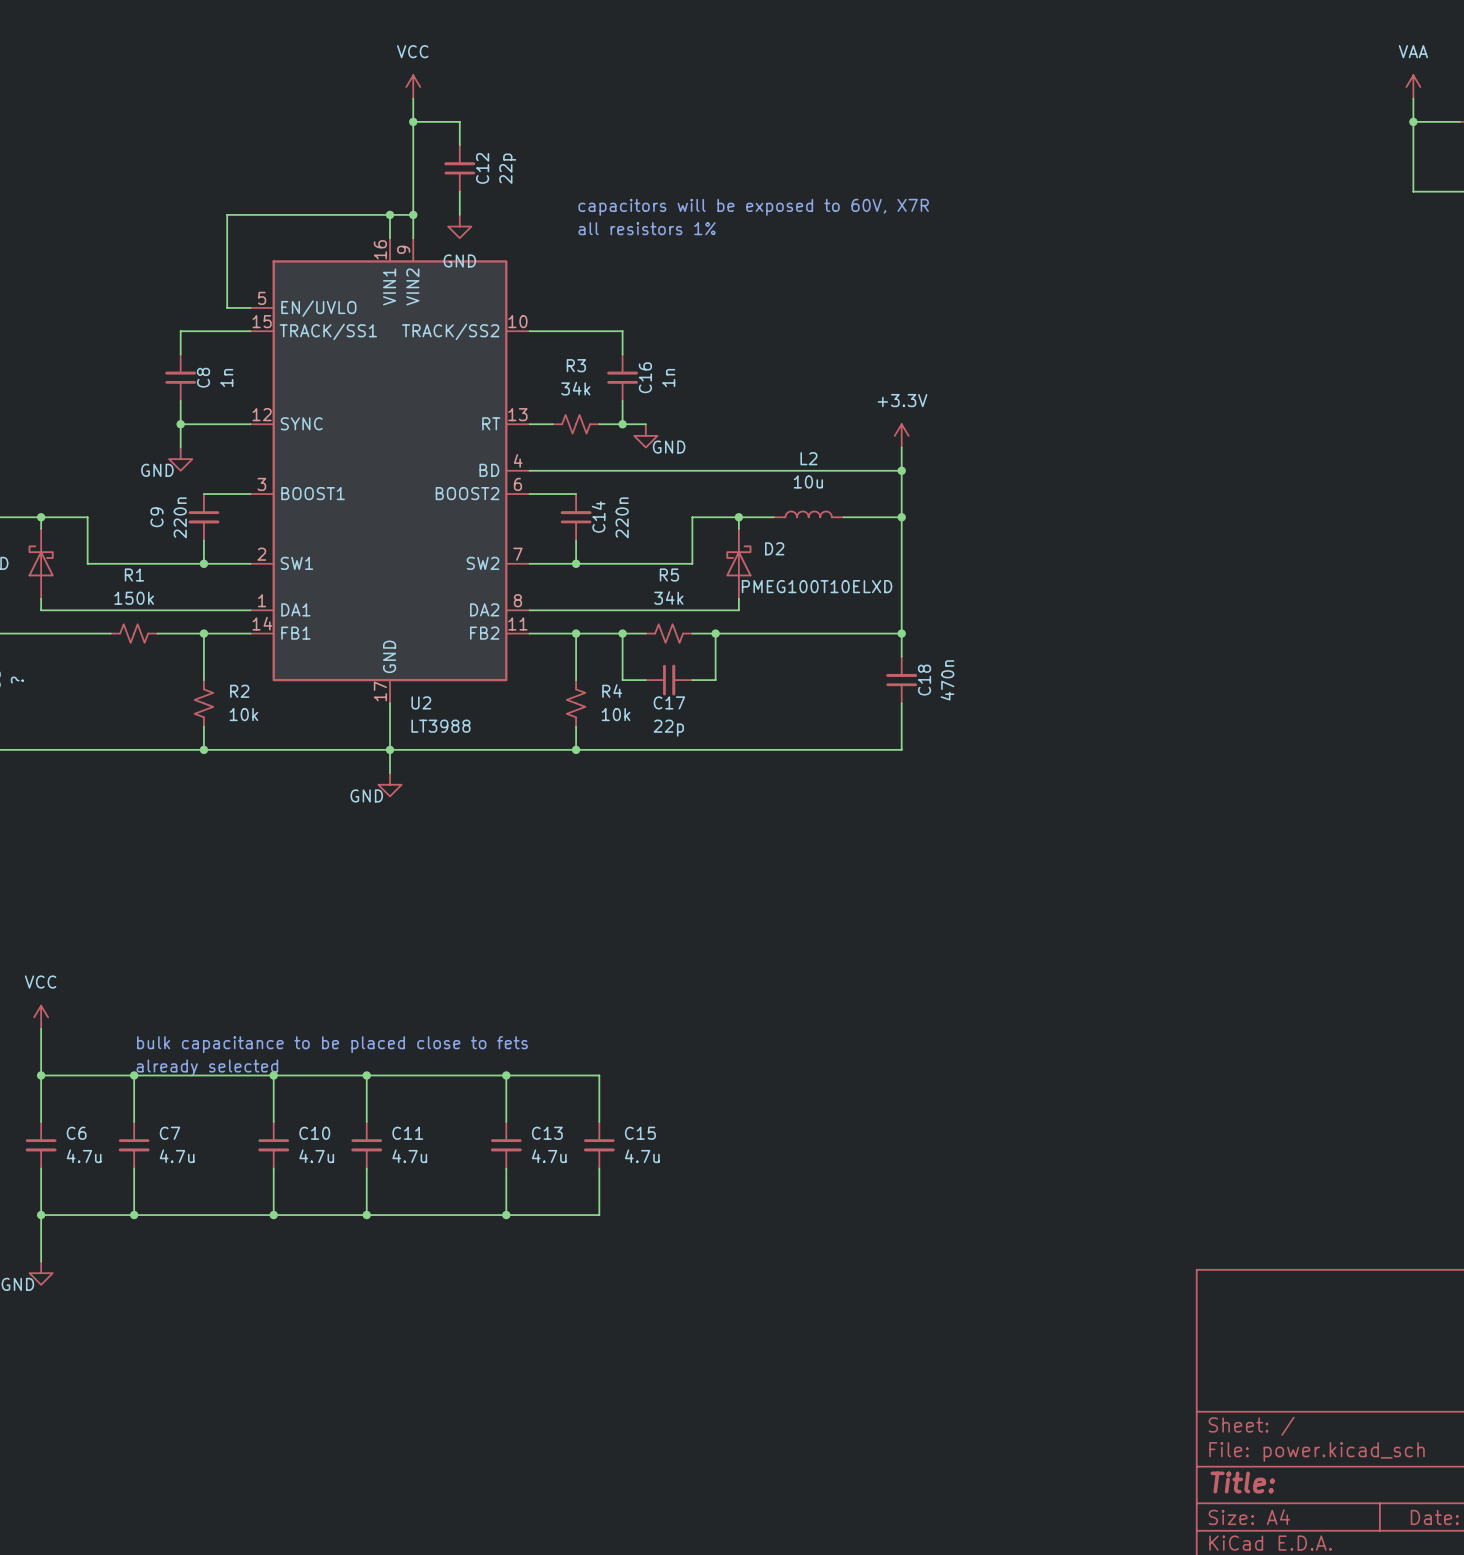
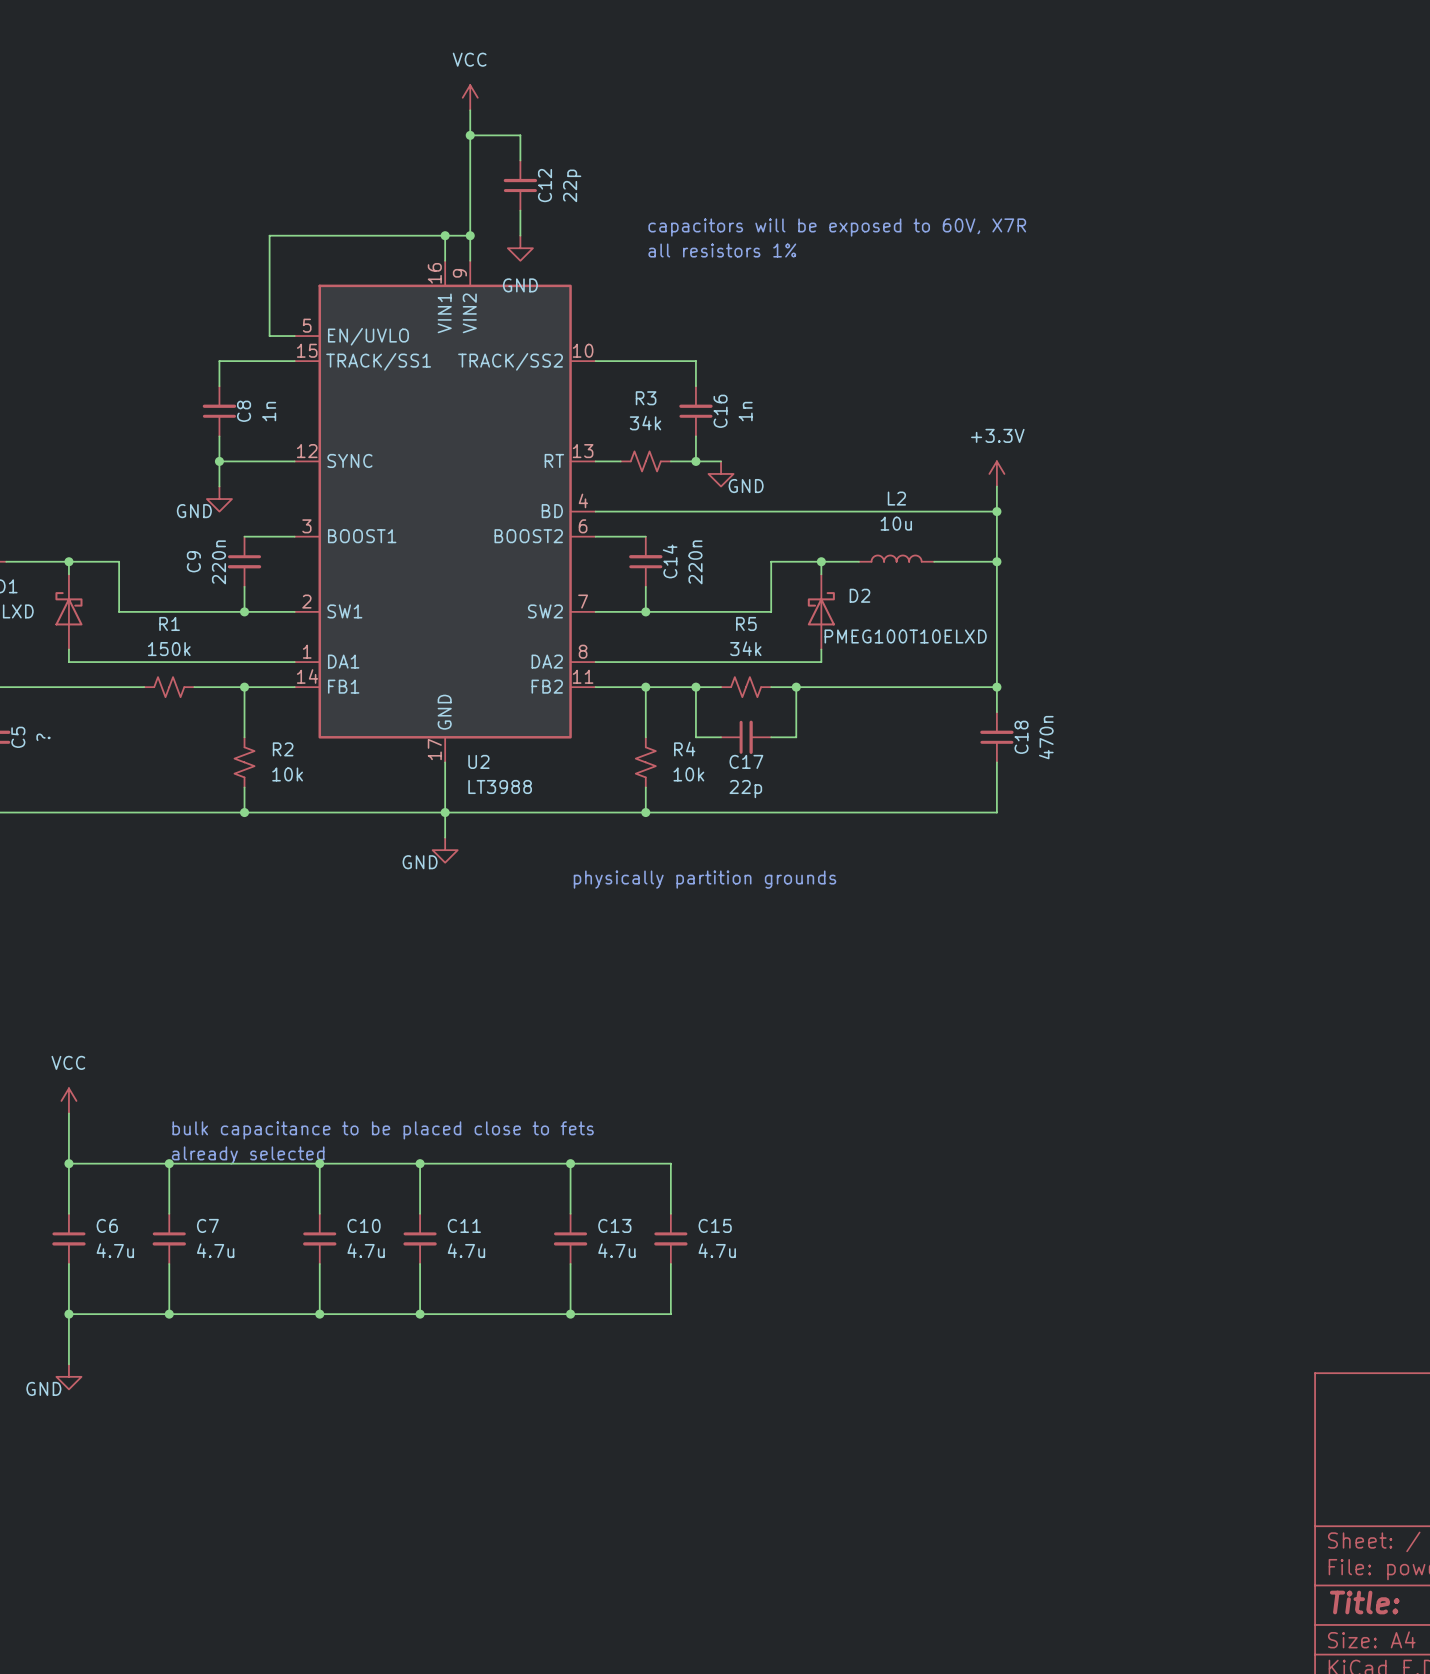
text: none -> physically partition grounds (705, 879)

